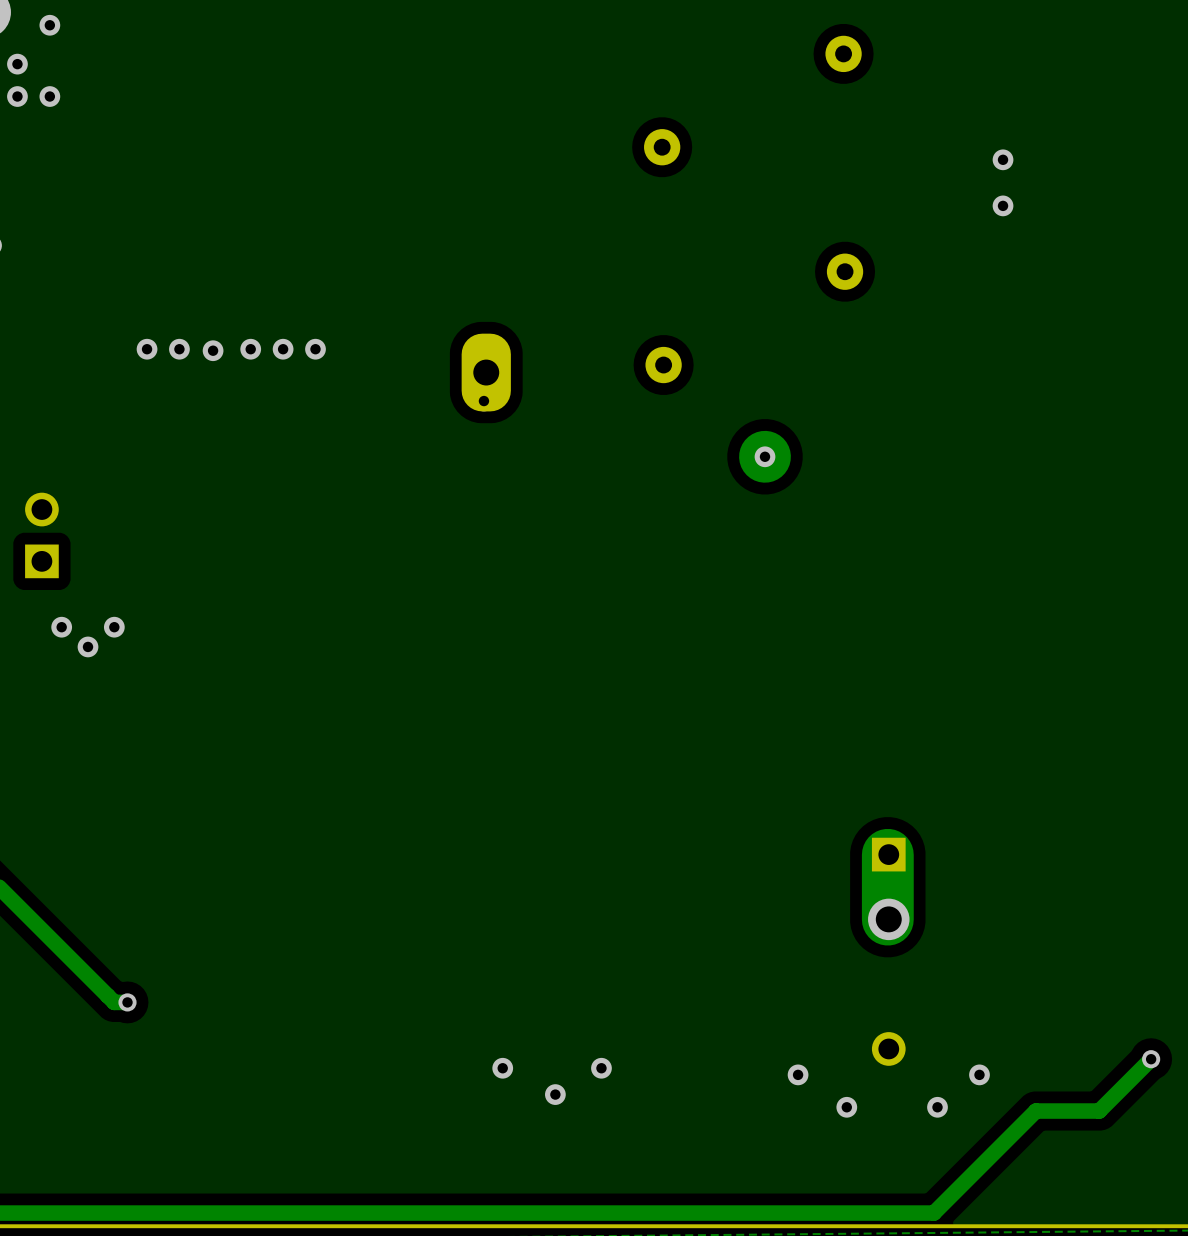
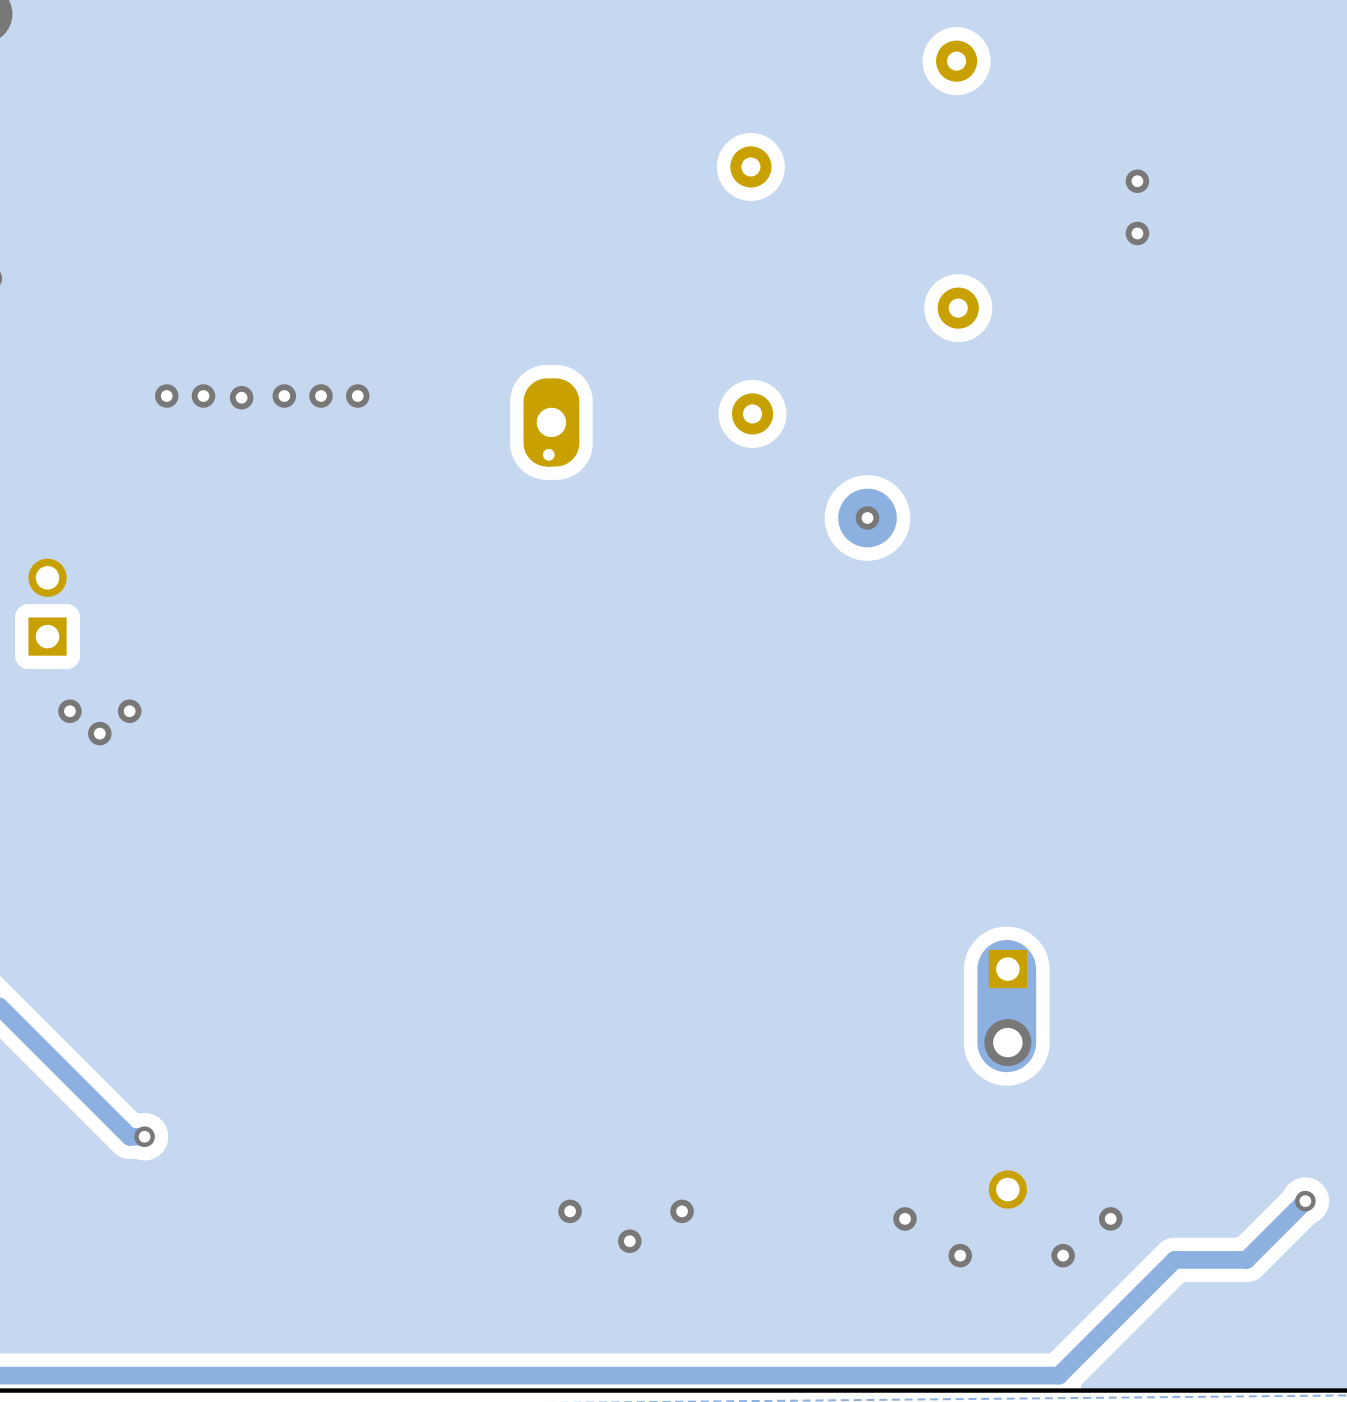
via: (49, 25) -> none
via: (17, 64) -> none
via: (17, 96) -> none
via: (49, 96) -> none

